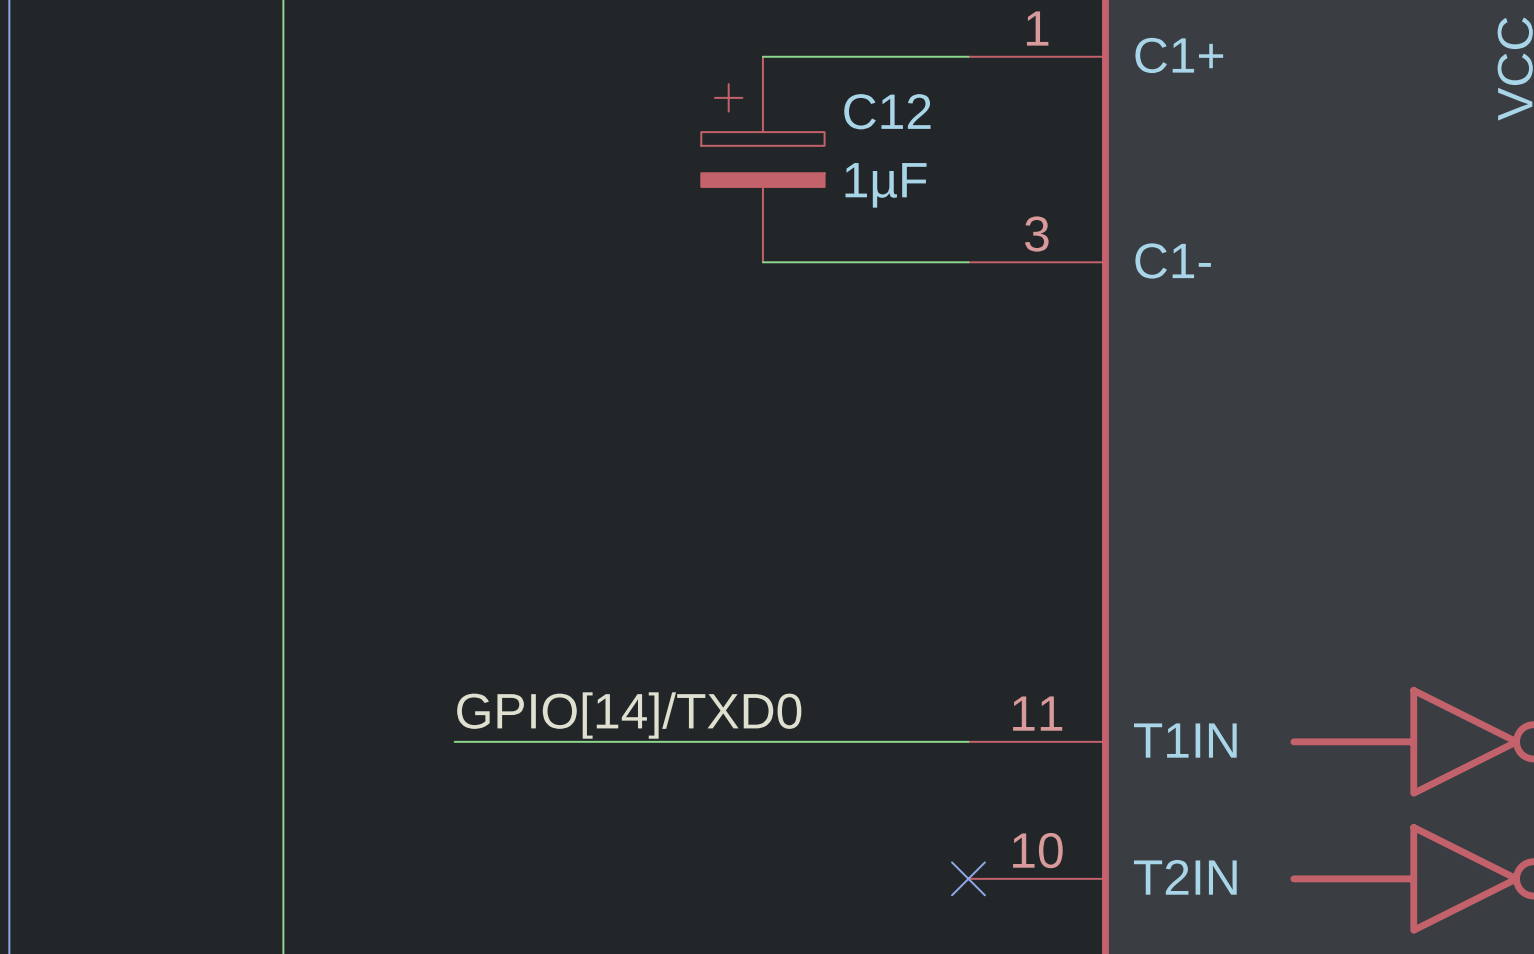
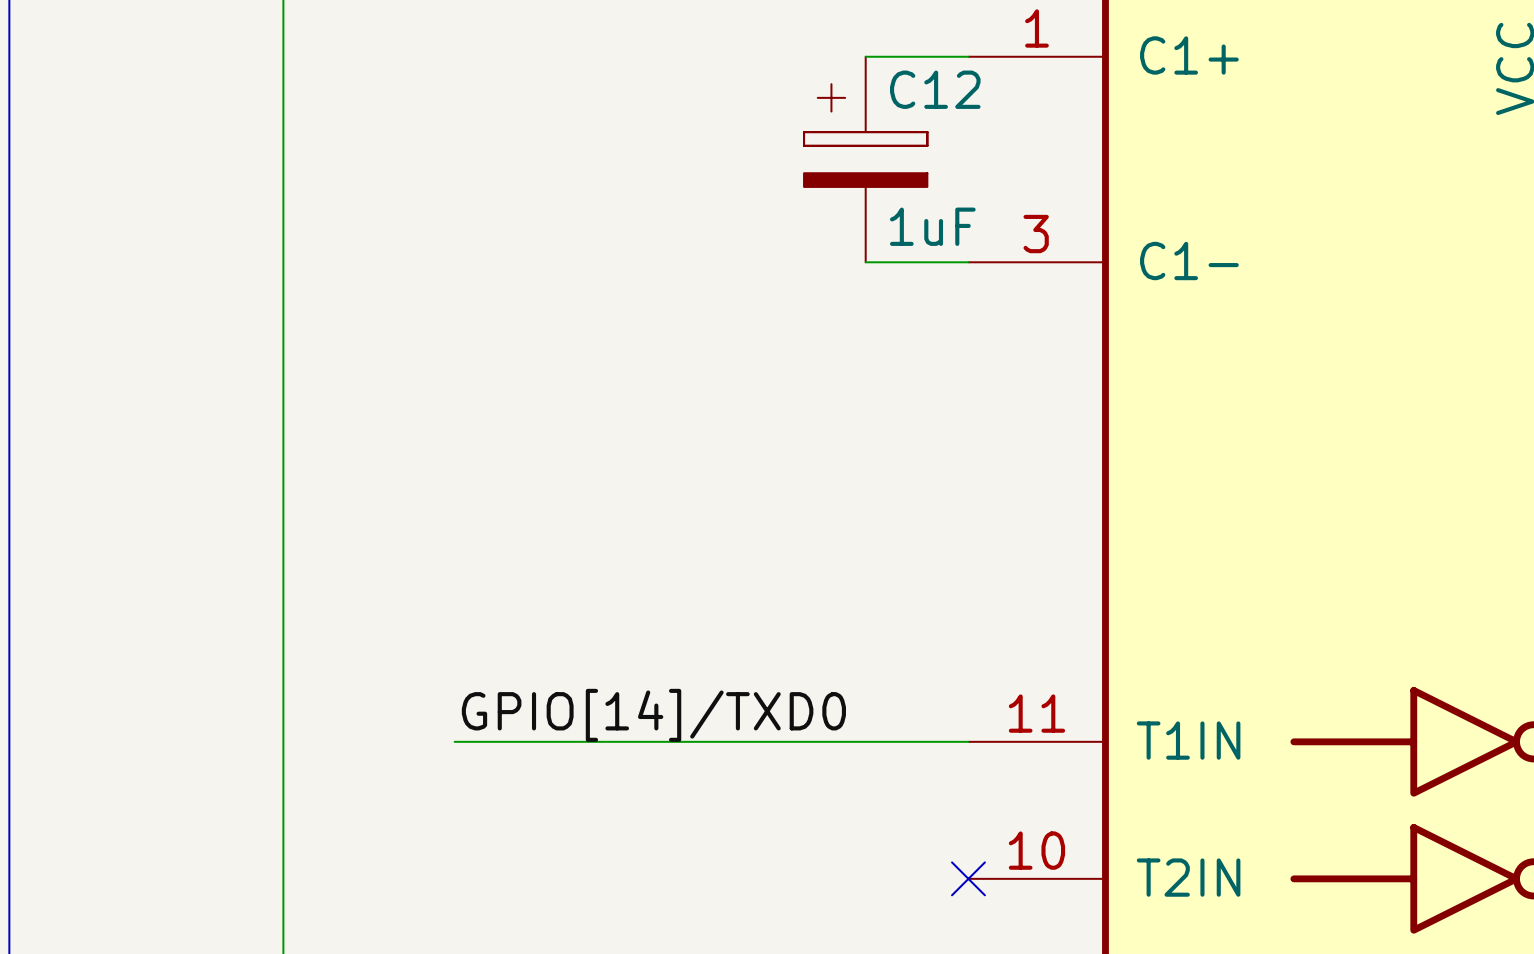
C12 symbol: [701, 56, 825, 263] -> [804, 56, 928, 263]
wire: (762, 56) (865, 56) -> none
C12 name position: C12 (887, 111) -> C12 (935, 89)
C12 value: 1µF (886, 185) -> 1uF (932, 226)
wire: (762, 262) (865, 262) -> none

